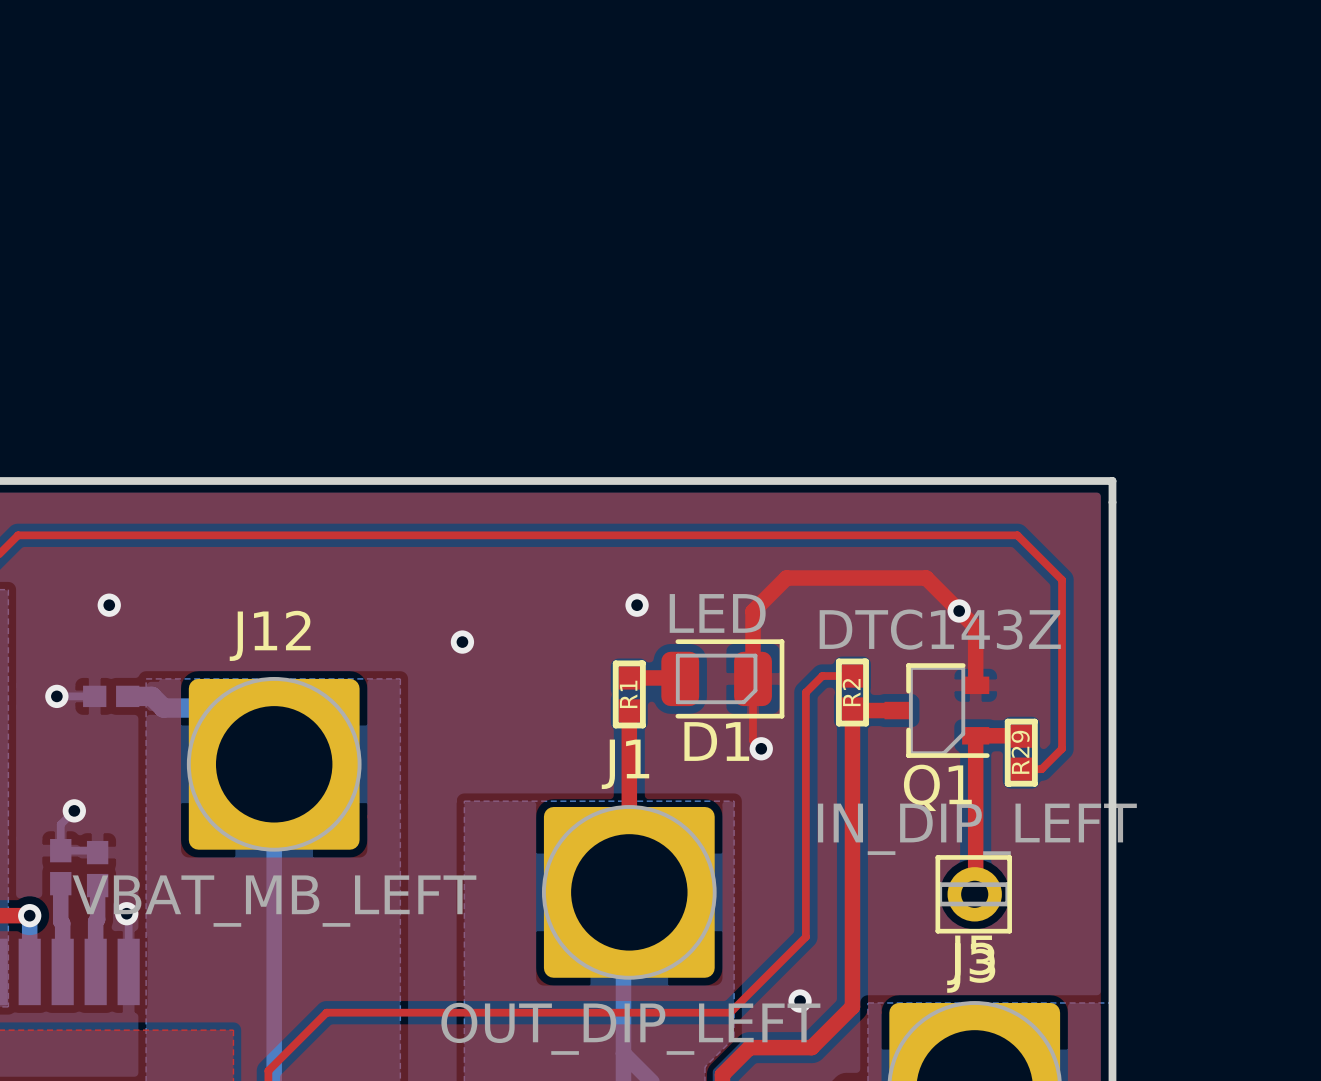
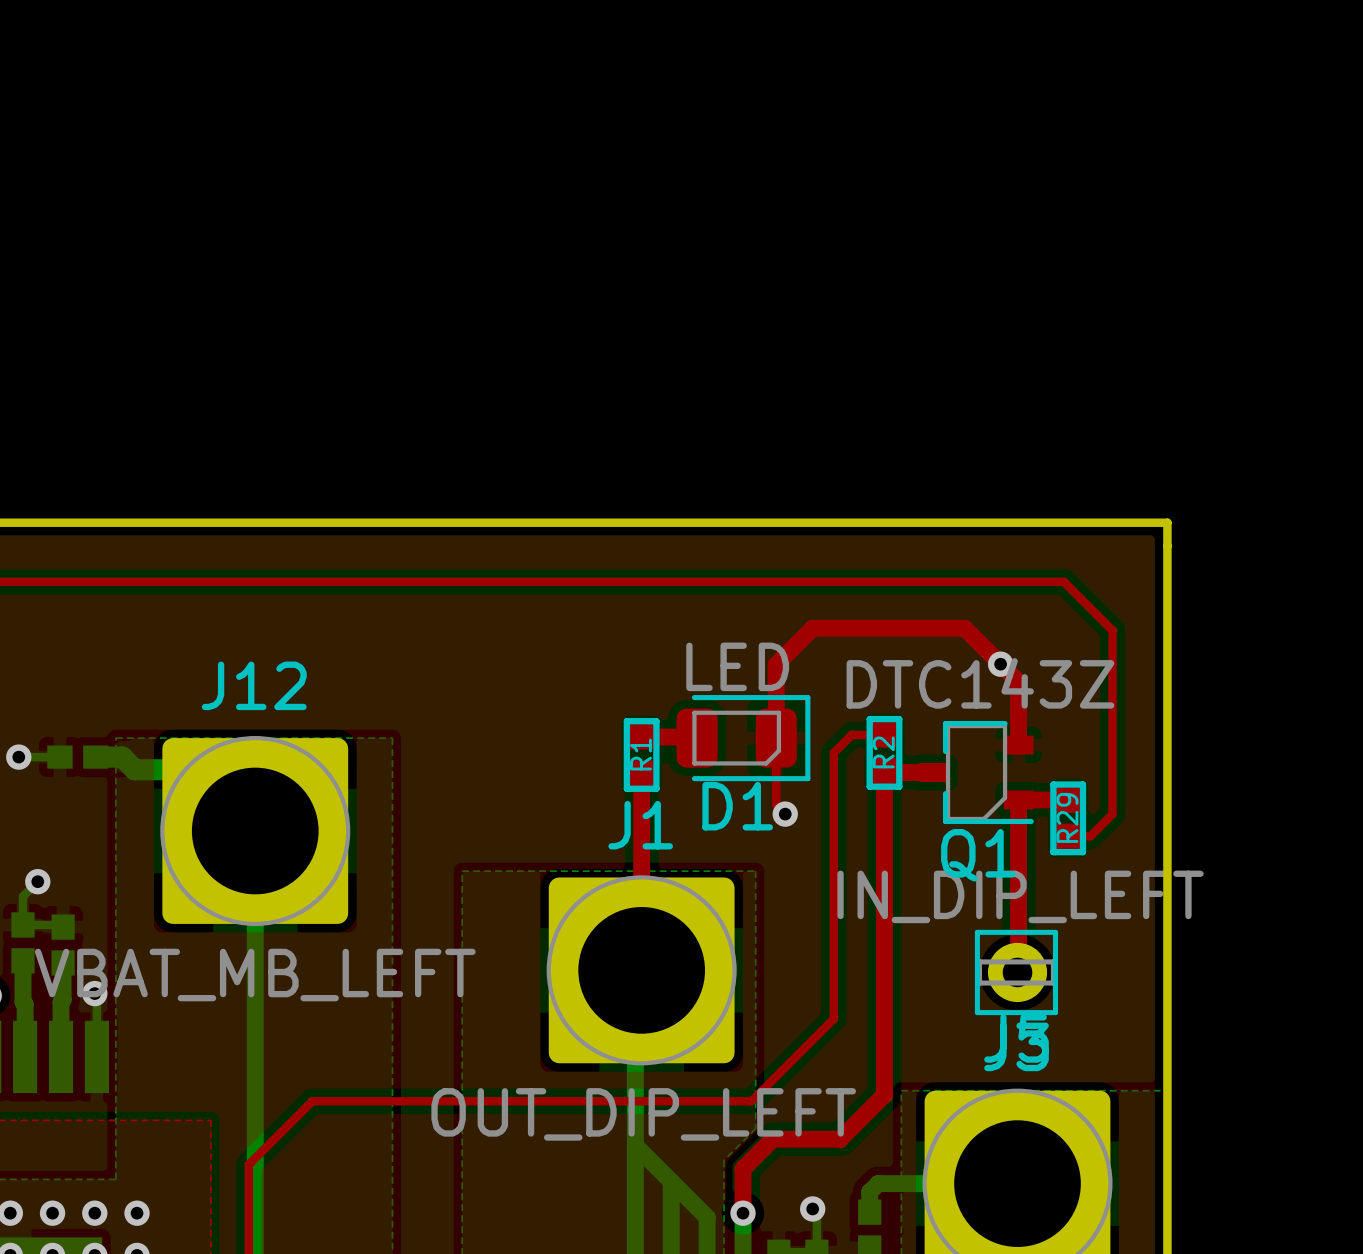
via: (109, 605) -> none
via: (637, 605) -> none
via: (462, 642) -> none
via: (800, 1001) -> none

